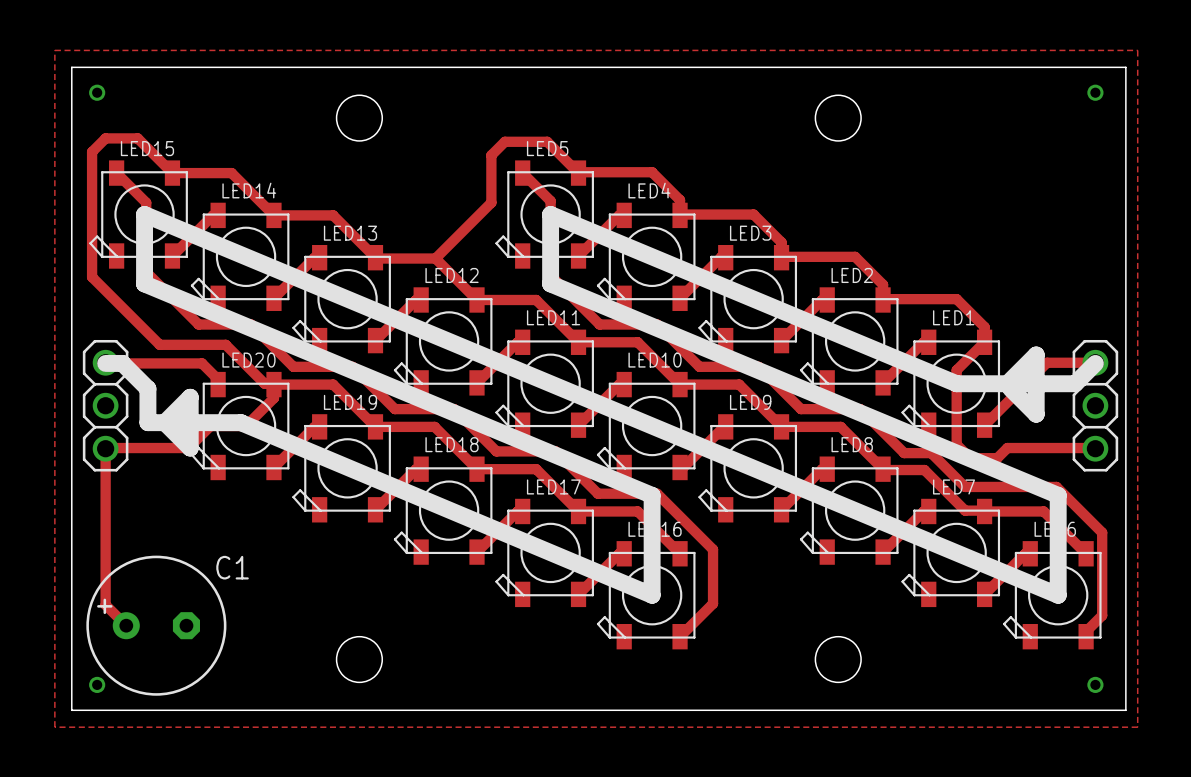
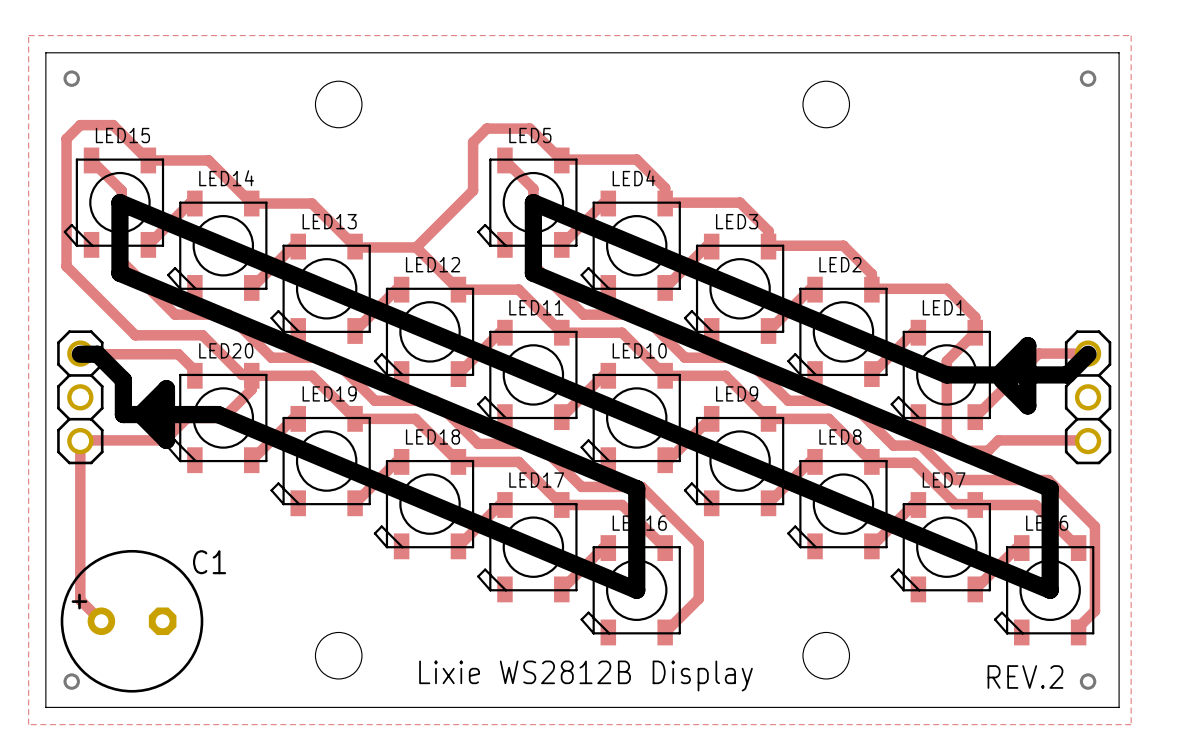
text: none -> Lixie WS2812B Display (586, 675)
text: none -> REV.2 (1025, 677)

